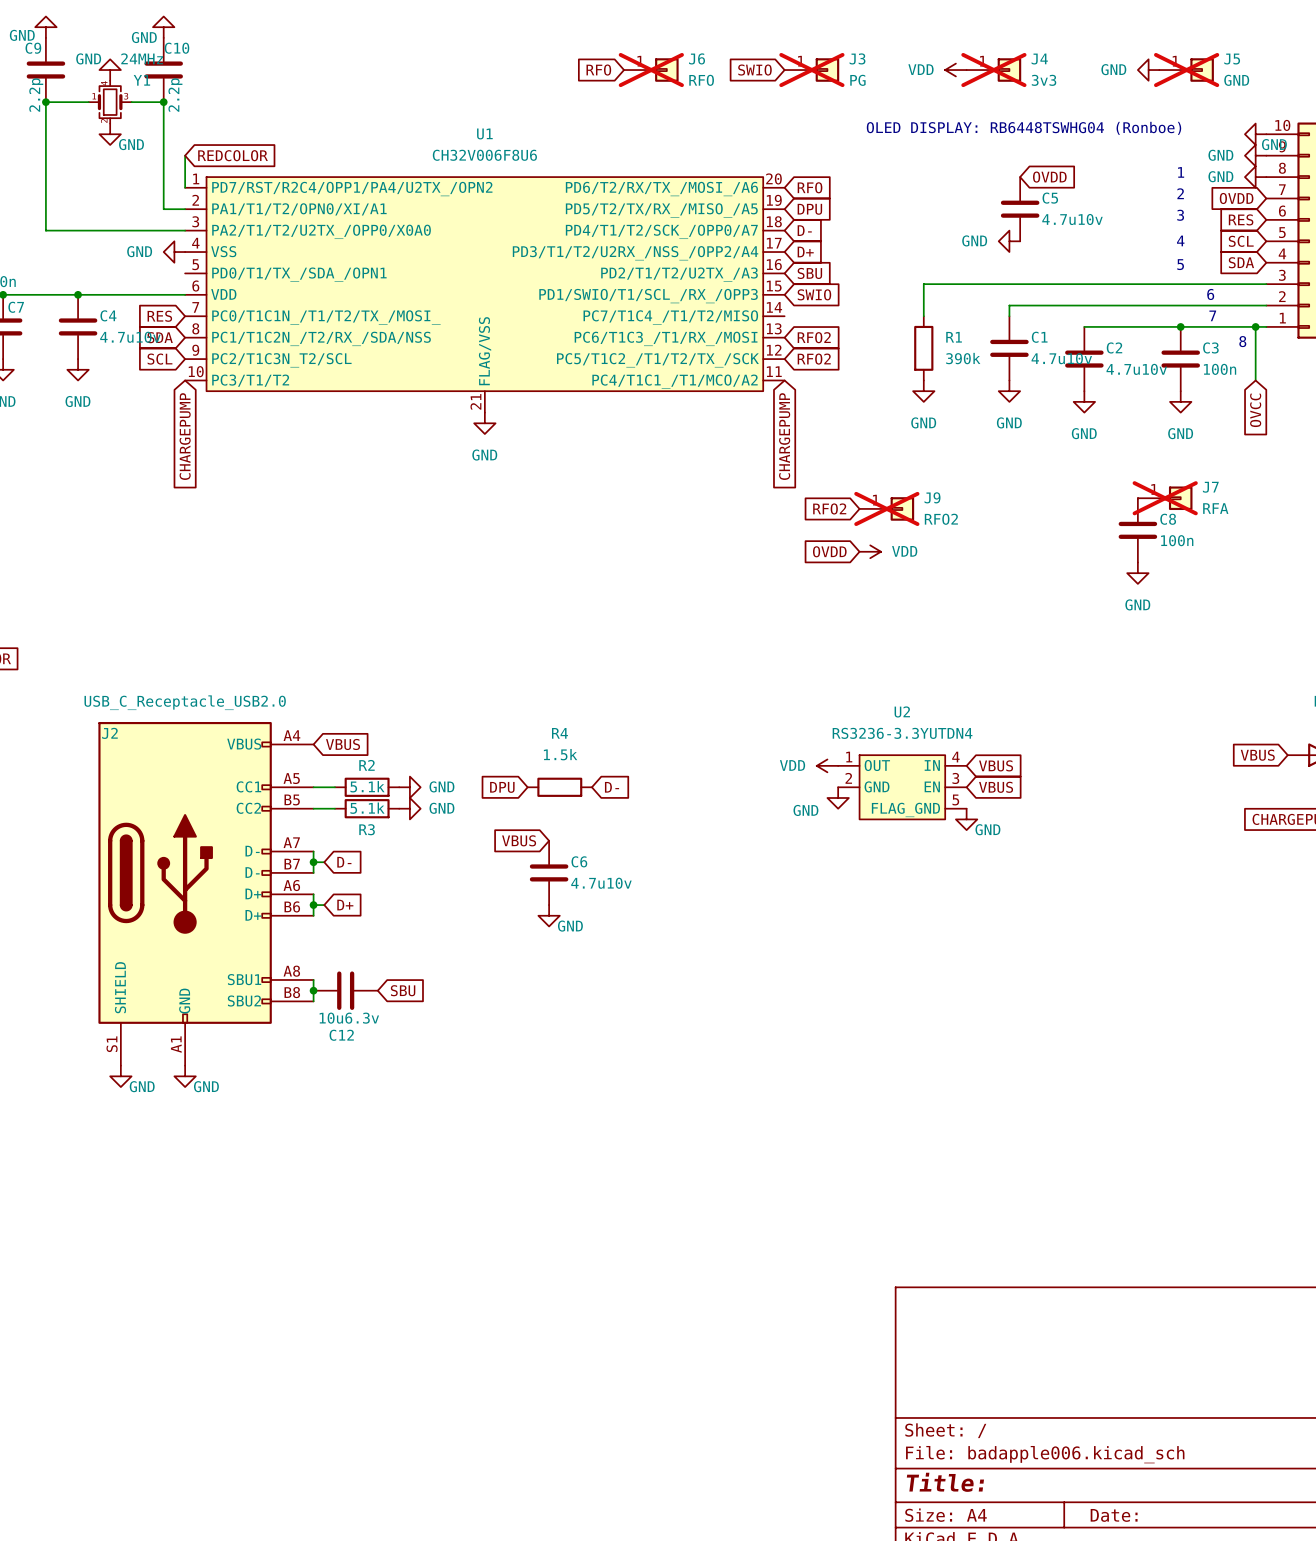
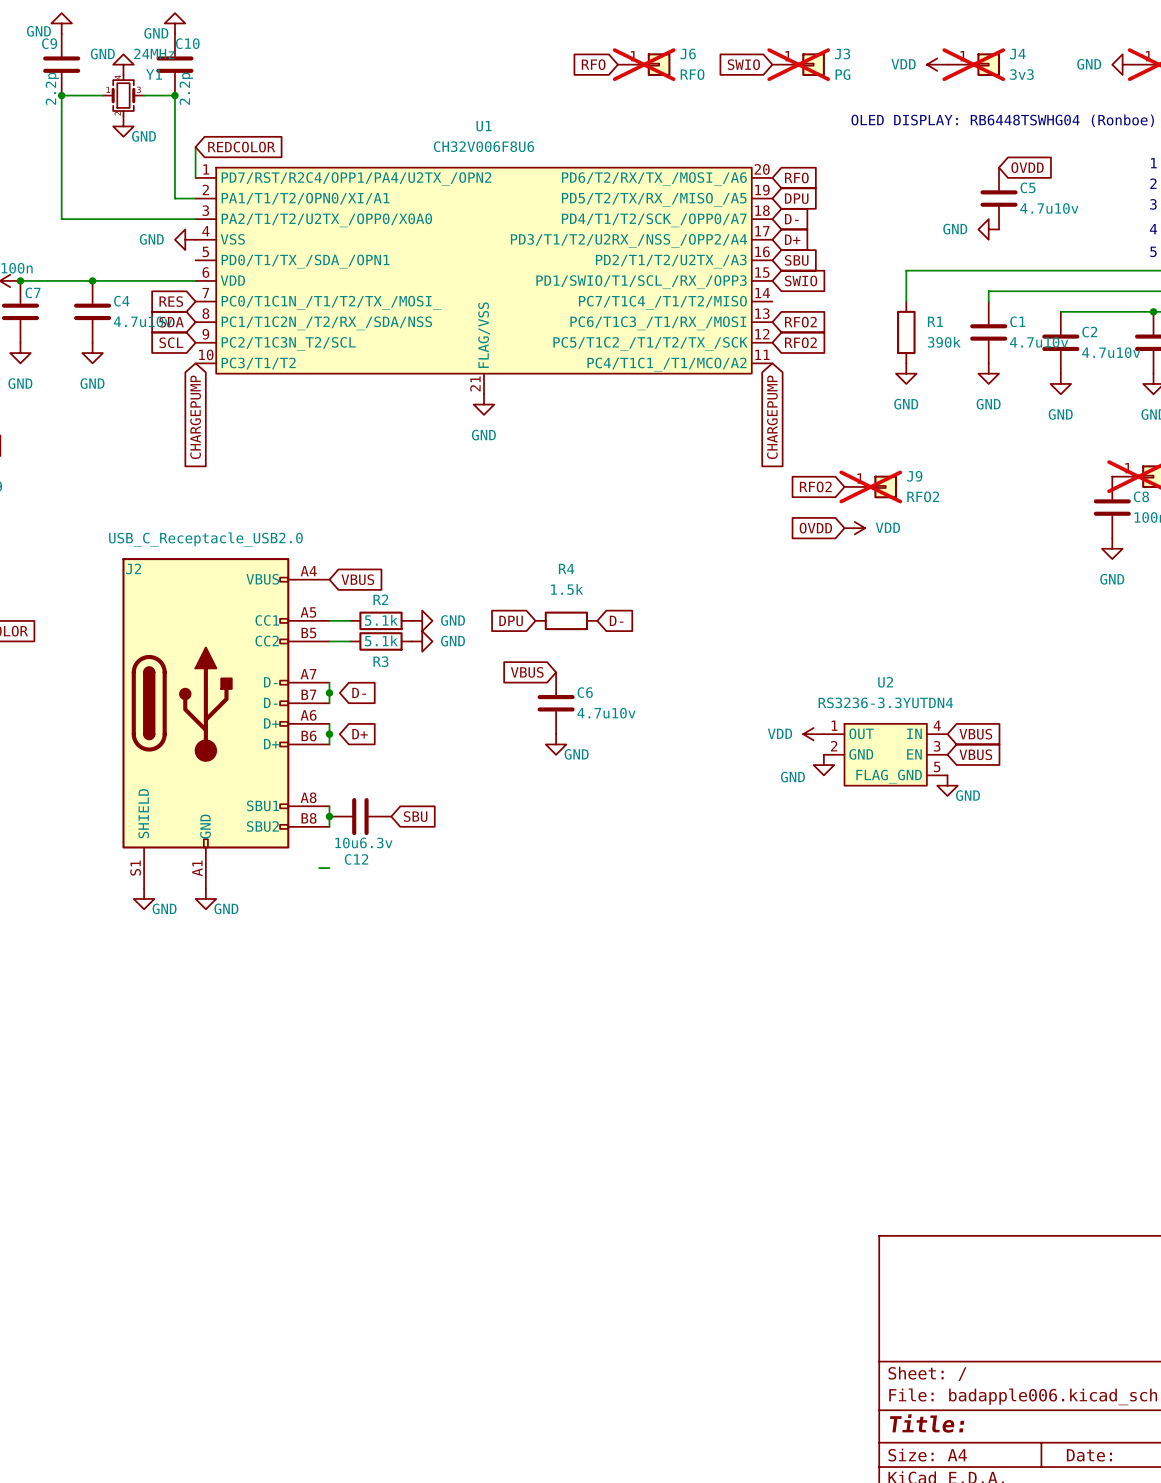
global label: none -> VBUS (357, 579)
power symbol: none -> GND (422, 620)
global label: none -> D- (616, 620)
power symbol: none -> GND (422, 641)
global label: none -> VBUS (527, 672)
junction: none -> (329, 692)
global label: none -> D- (359, 692)
global label: VBUS (343, 744) -> none
junction: none -> (329, 734)
power symbol: none -> GND (556, 744)
wire: (313, 787) (334, 787) -> (329, 620) (350, 620)
R2 position: (367, 787) -> (380, 620)
power symbol: GND (409, 787) -> none
global label position: DPU (502, 787) -> DPU (511, 620)
R4 position: (559, 787) -> (566, 620)
global label: D- (612, 787) -> none
wire: (313, 808) (334, 808) -> (329, 641) (350, 641)
R3 position: (367, 808) -> (380, 641)
power symbol: GND (409, 808) -> none
global label: VBUS (519, 840) -> none
wire: (313, 851) (313, 872) -> (329, 682) (329, 703)
junction position: (313, 862) -> (329, 816)
global label: D- (344, 862) -> none
C6 position: (549, 872) -> (556, 703)
J2 position: (205, 893) -> (225, 723)
wire: (313, 894) (313, 915) -> (329, 723) (329, 744)
junction: (313, 905) -> none
global label position: D+ (345, 905) -> D+ (360, 734)
power symbol: GND (549, 915) -> none
power symbol: none -> GND (144, 898)
power symbol: none -> GND (205, 898)
wire: (313, 979) (313, 1001) -> none
junction: (313, 990) -> none
C12 position: (345, 990) -> (360, 816)
global label position: SBU (403, 990) -> SBU (415, 816)
power symbol: GND (120, 1076) -> none
power symbol: GND (185, 1076) -> none

